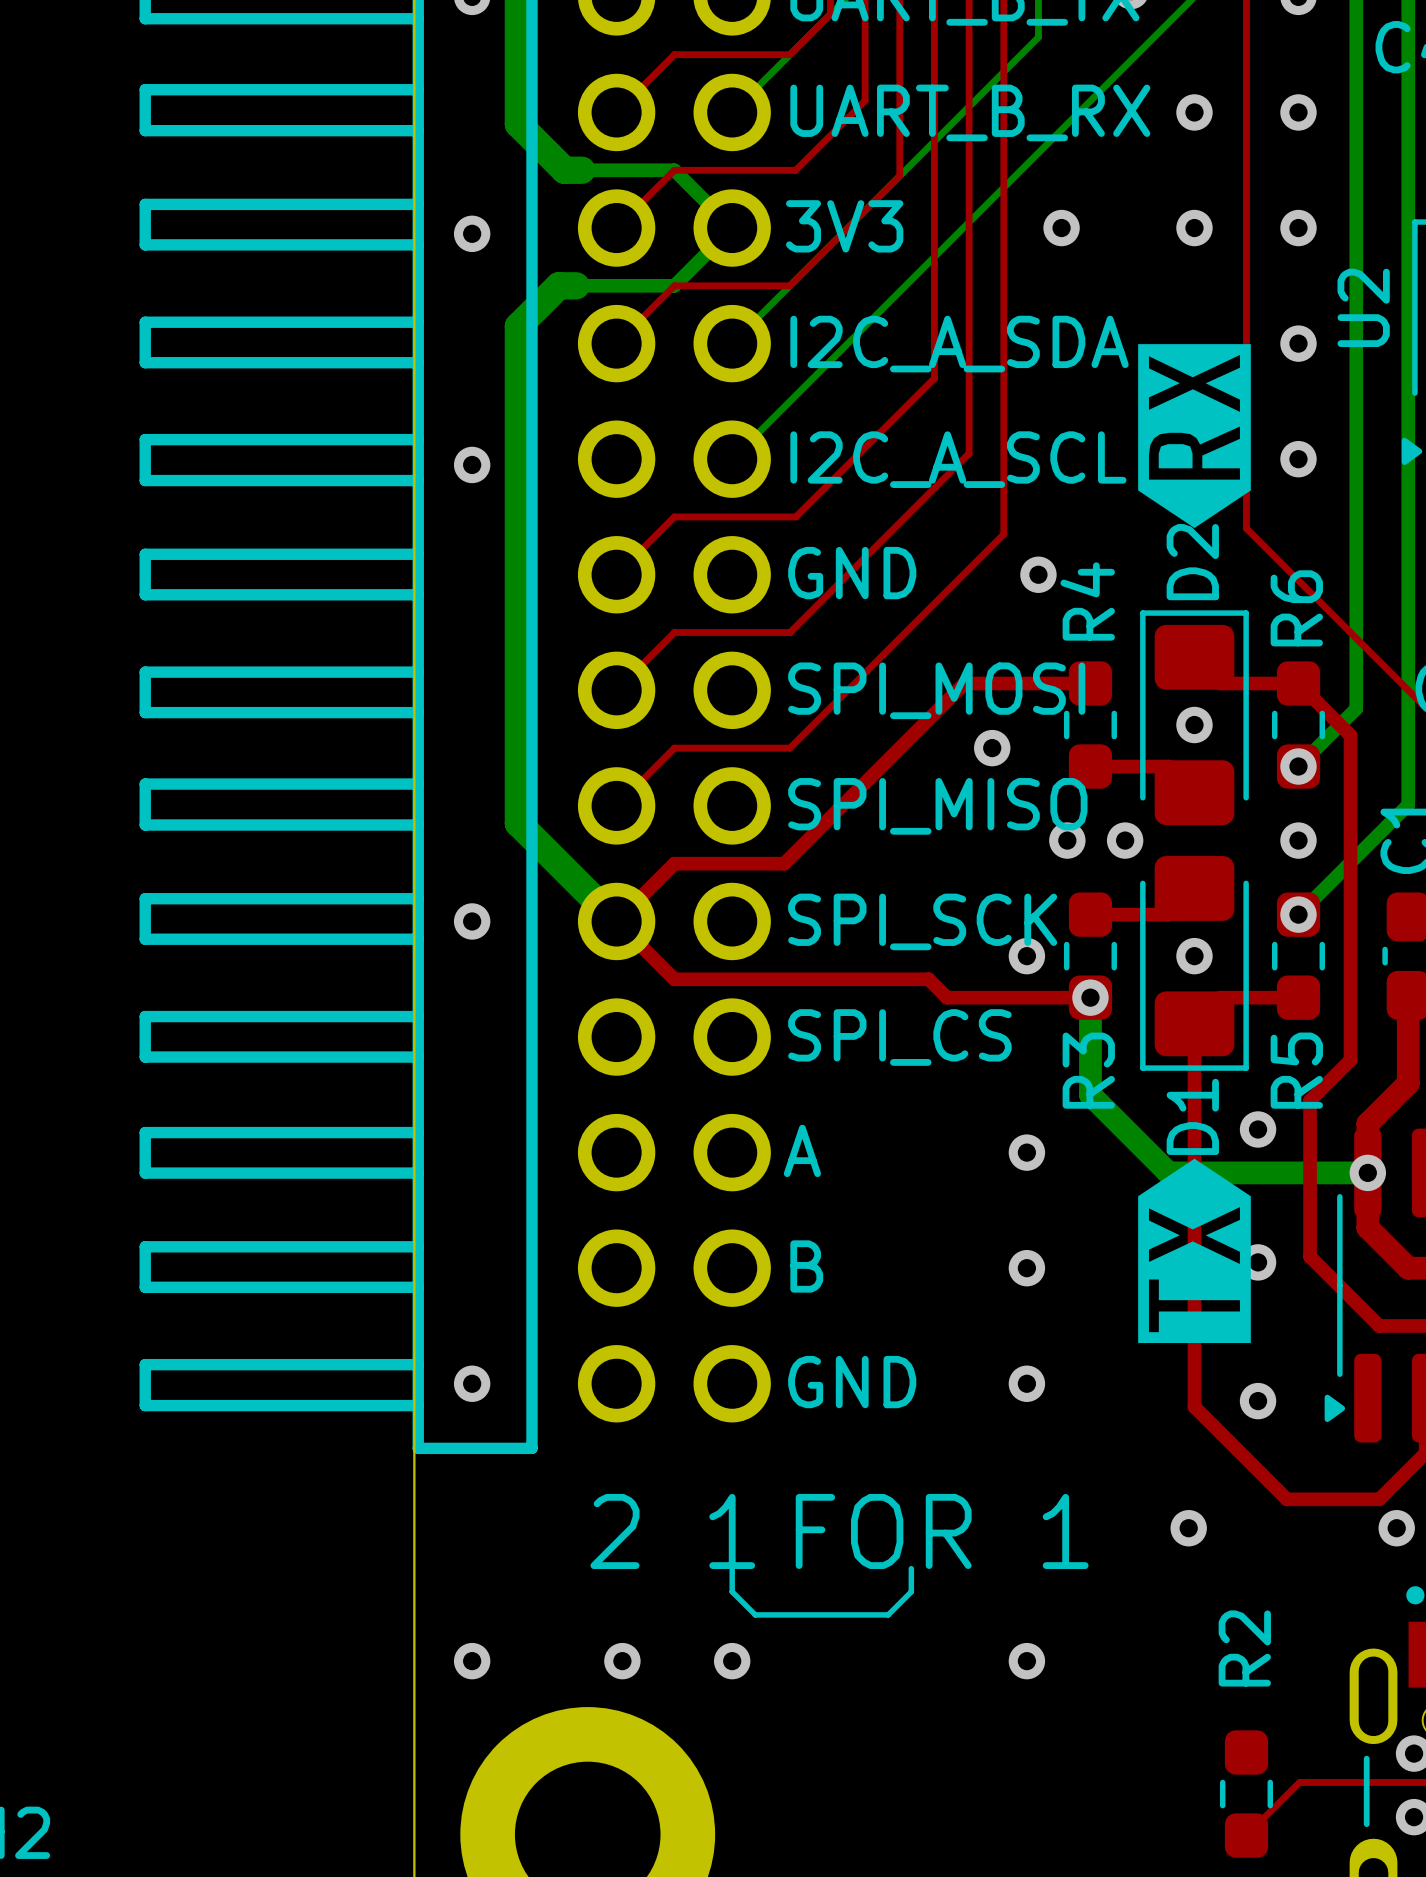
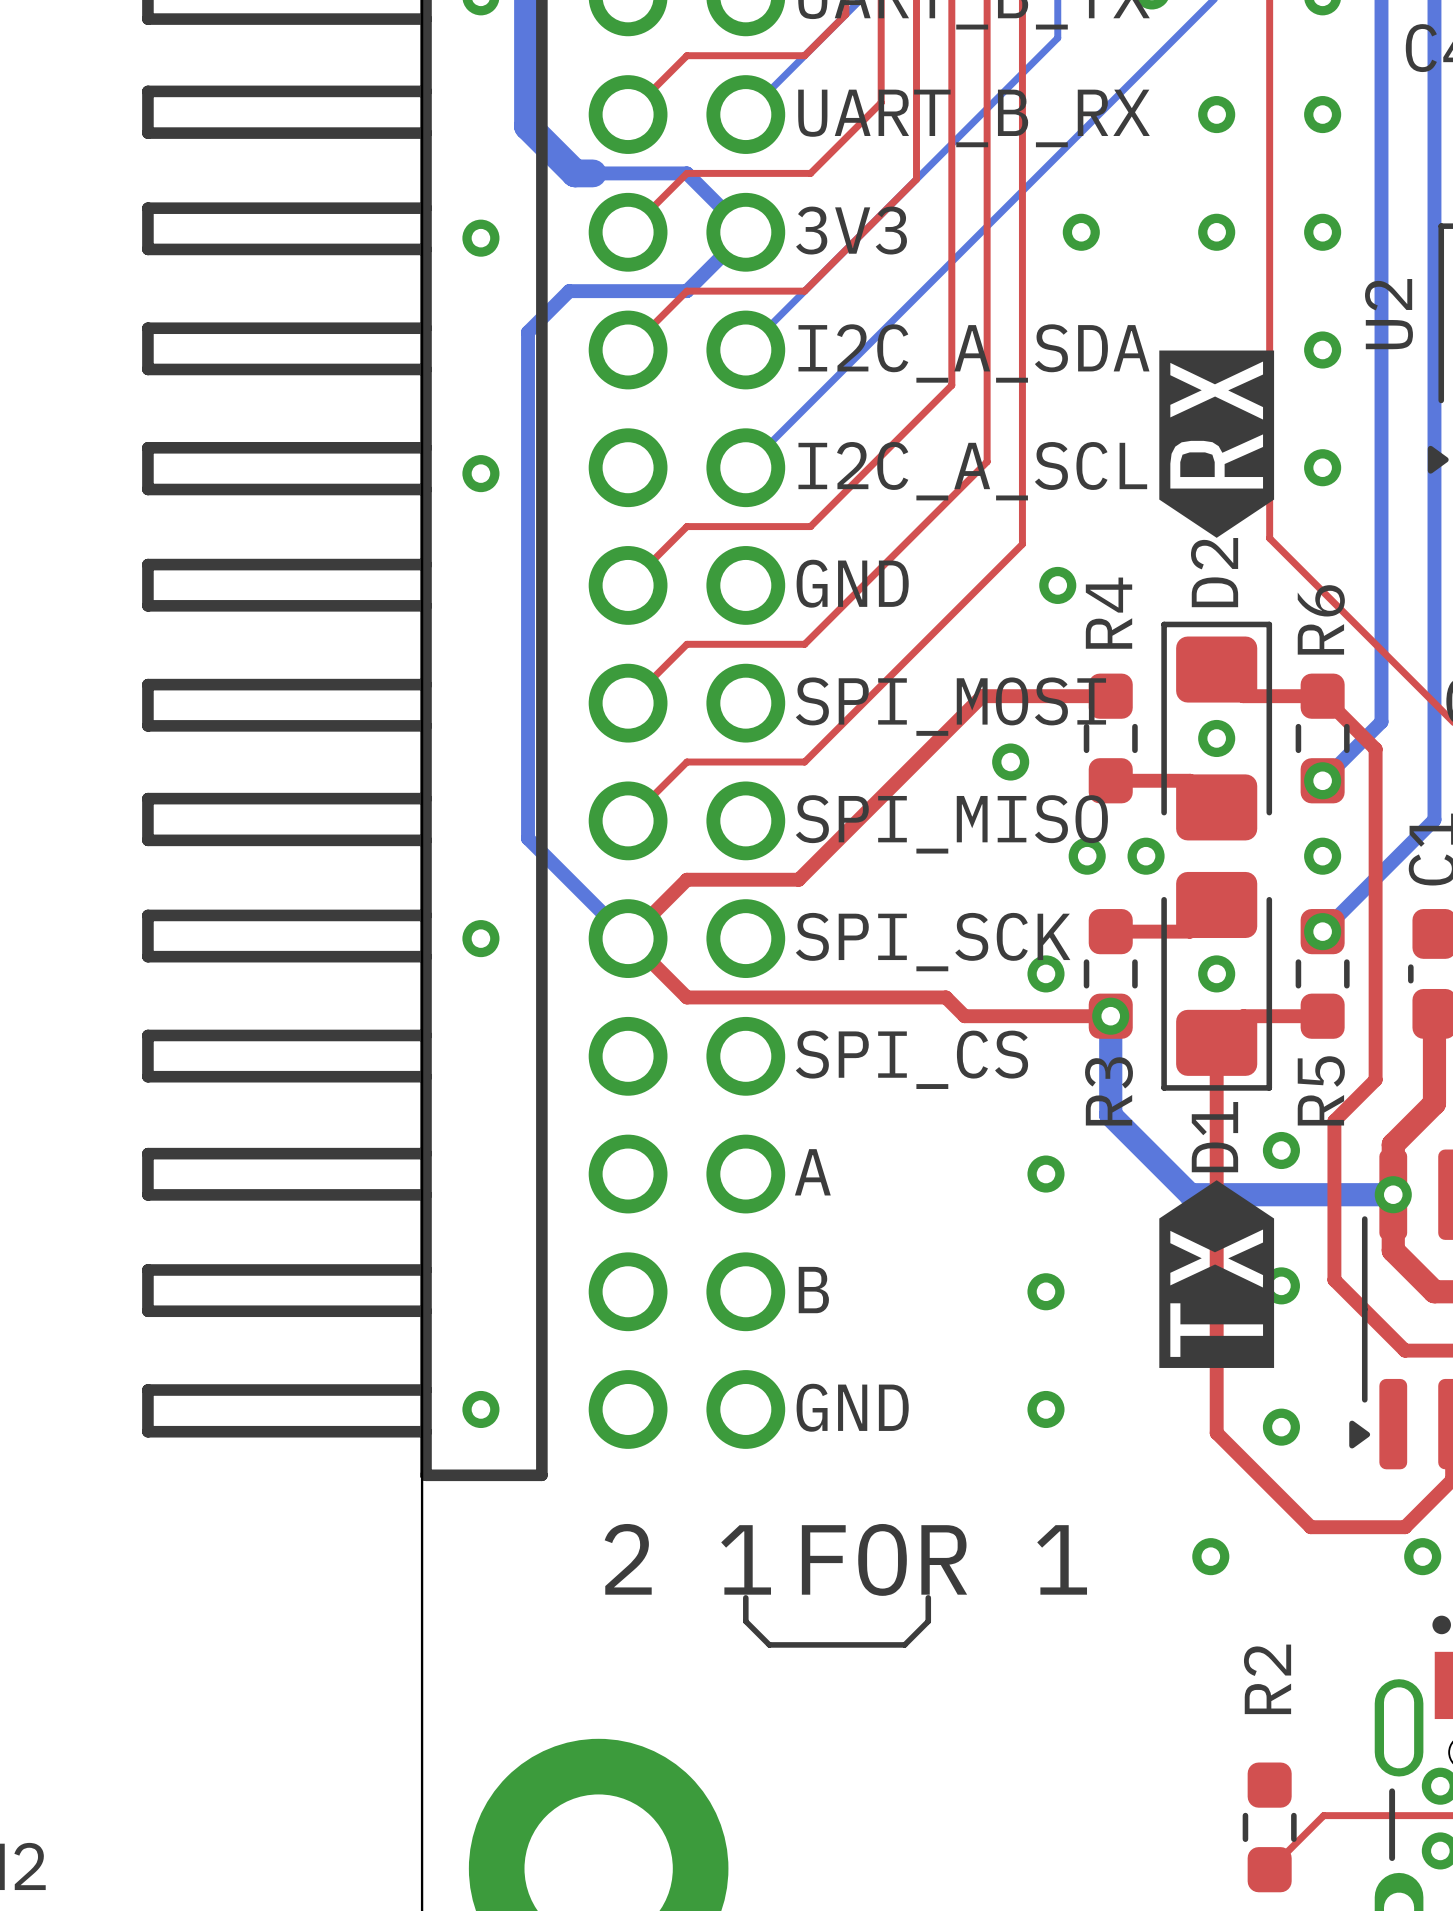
bottom track width: thick (576, 285) (558, 285) (518, 326) (518, 823) (616, 921) -> thin (586, 291) (569, 291) (528, 332) (528, 838) (628, 938)
via: (472, 1661) -> none
via: (622, 1661) -> none
via: (732, 1661) -> none
via: (1026, 1661) -> none

